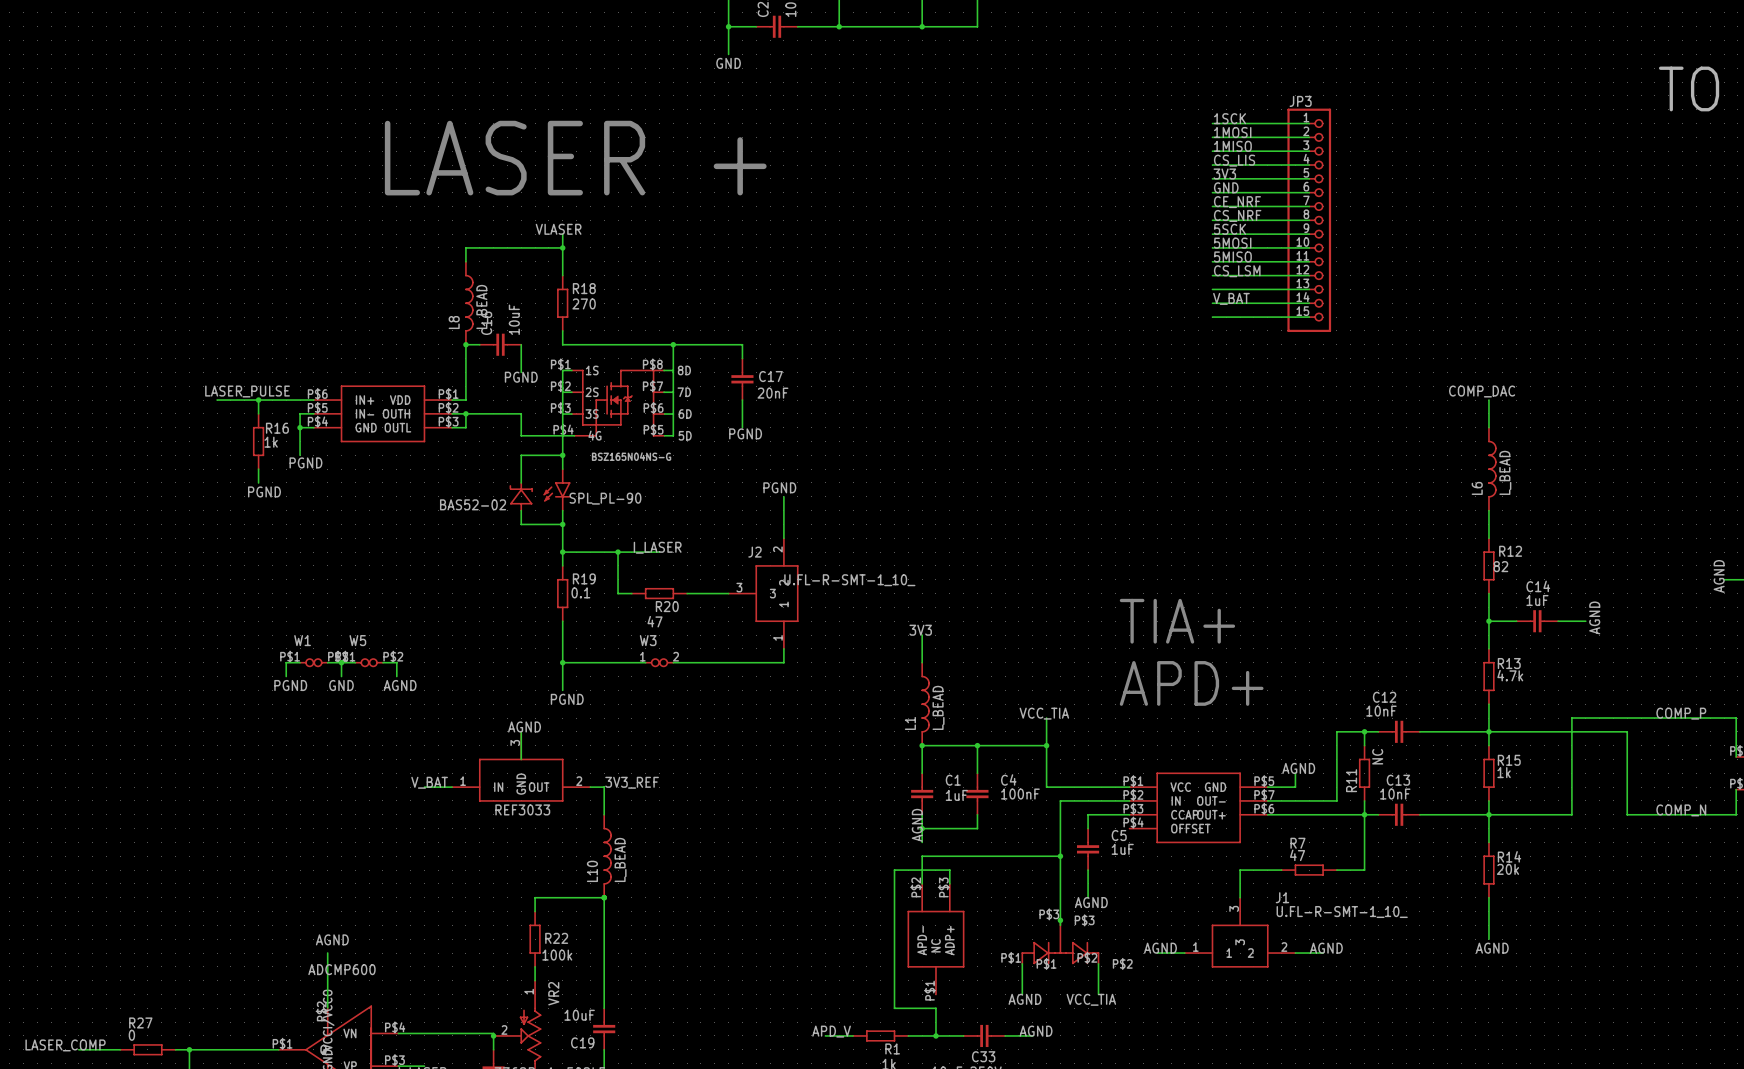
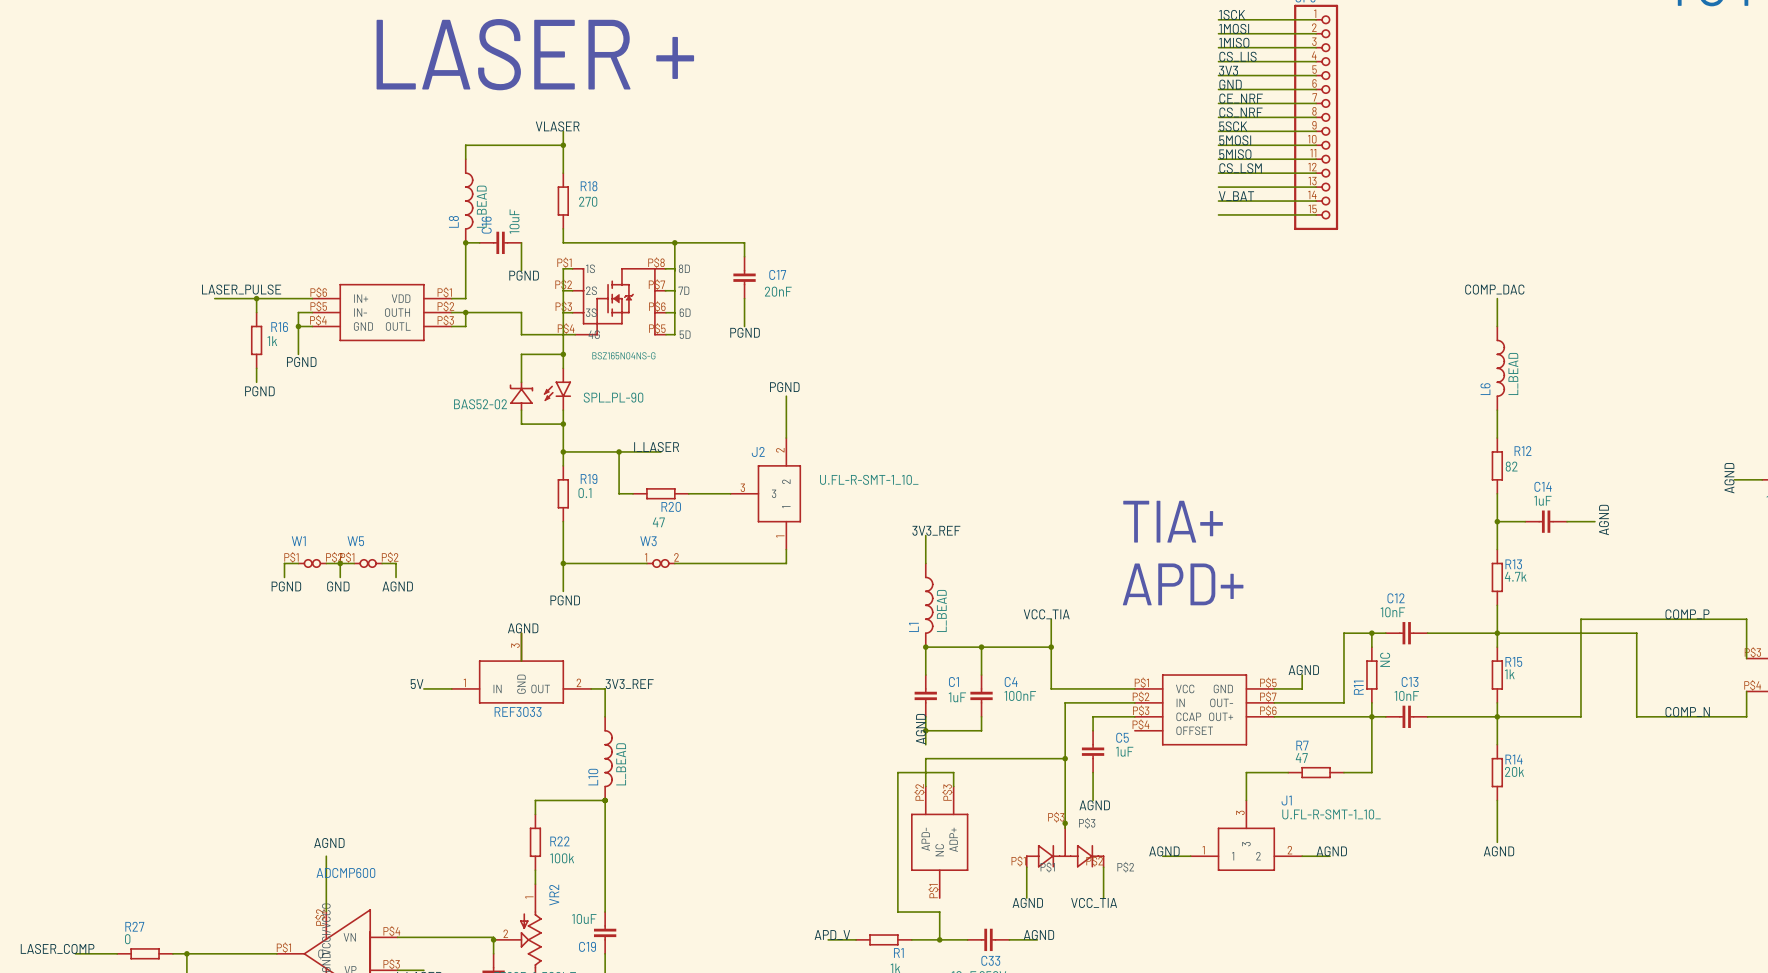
label: 3V3 (920, 630) -> 3V3_REF (936, 530)
label: V_BAT (429, 782) -> 5V (417, 684)

